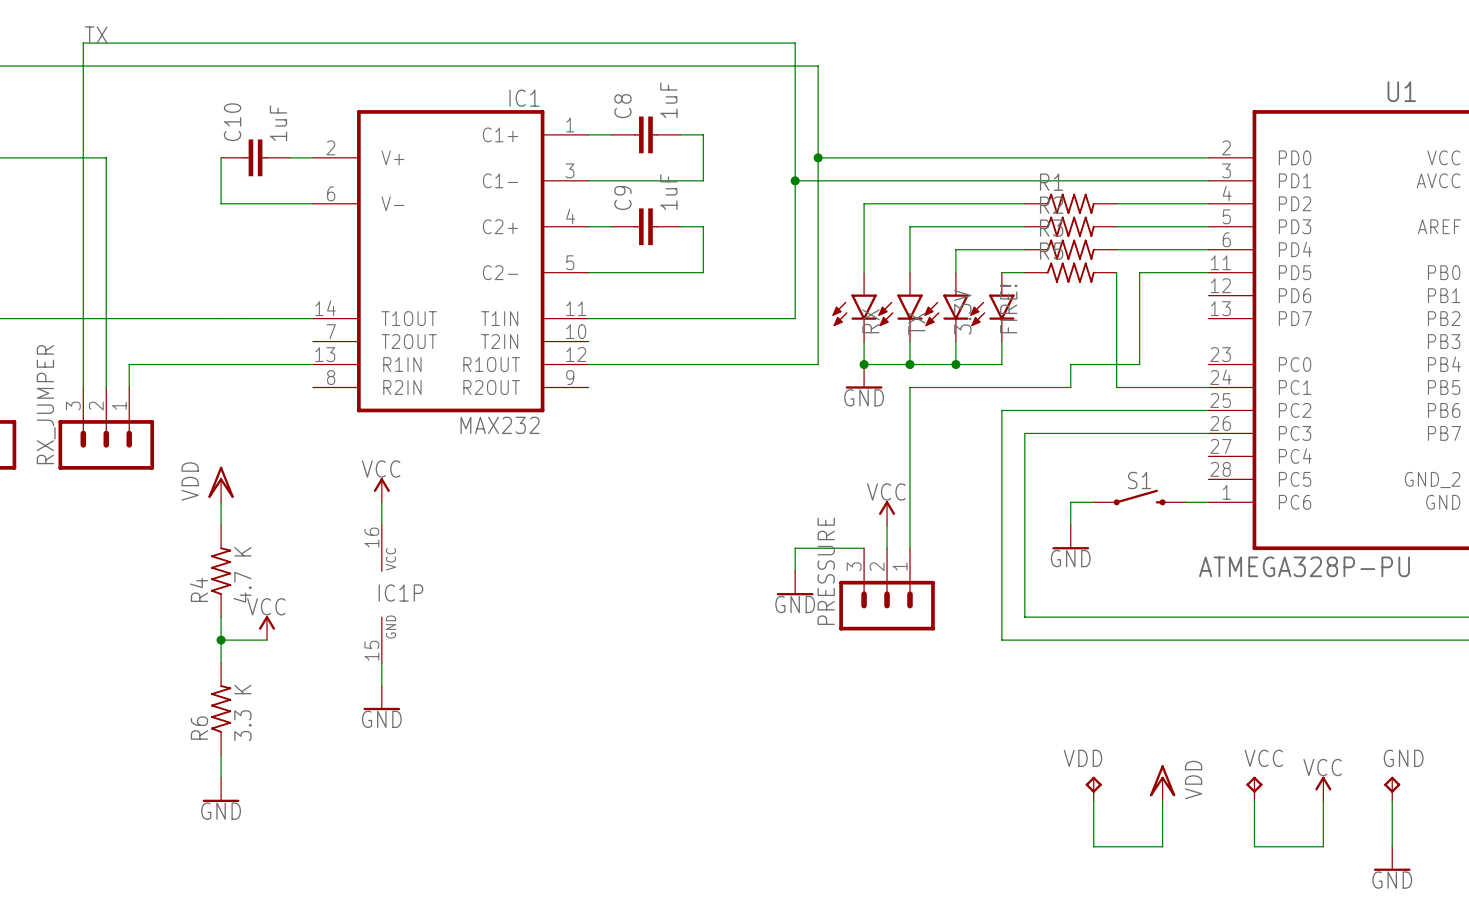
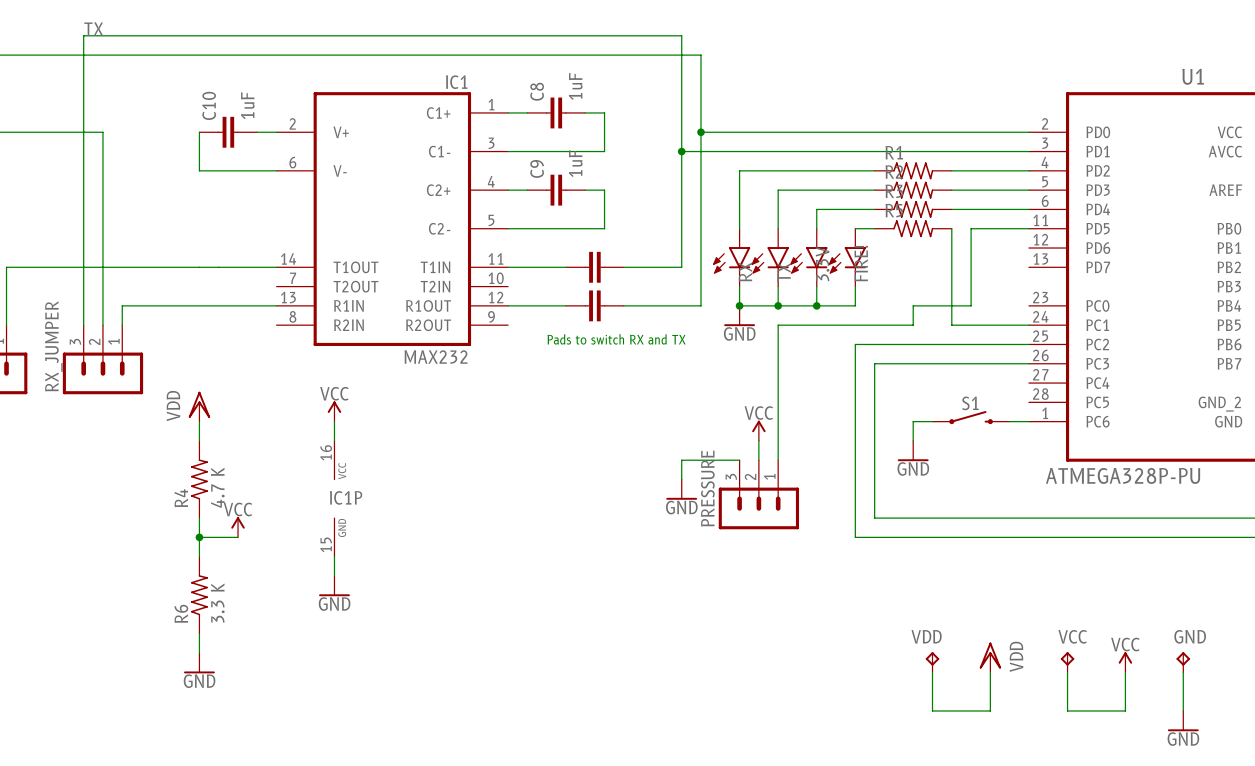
part: none -> (594, 267)
part: none -> (594, 305)
text: none -> Pads to switch RX and TX (616, 339)

